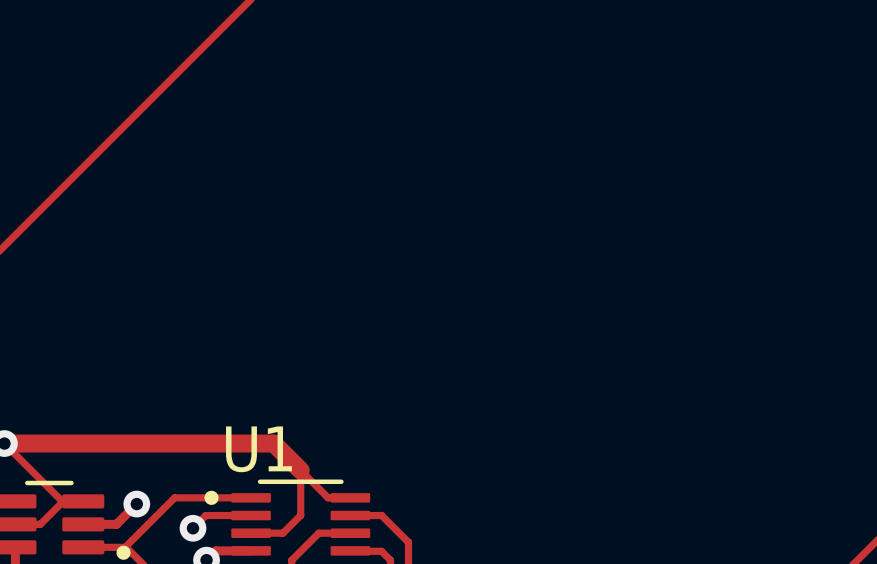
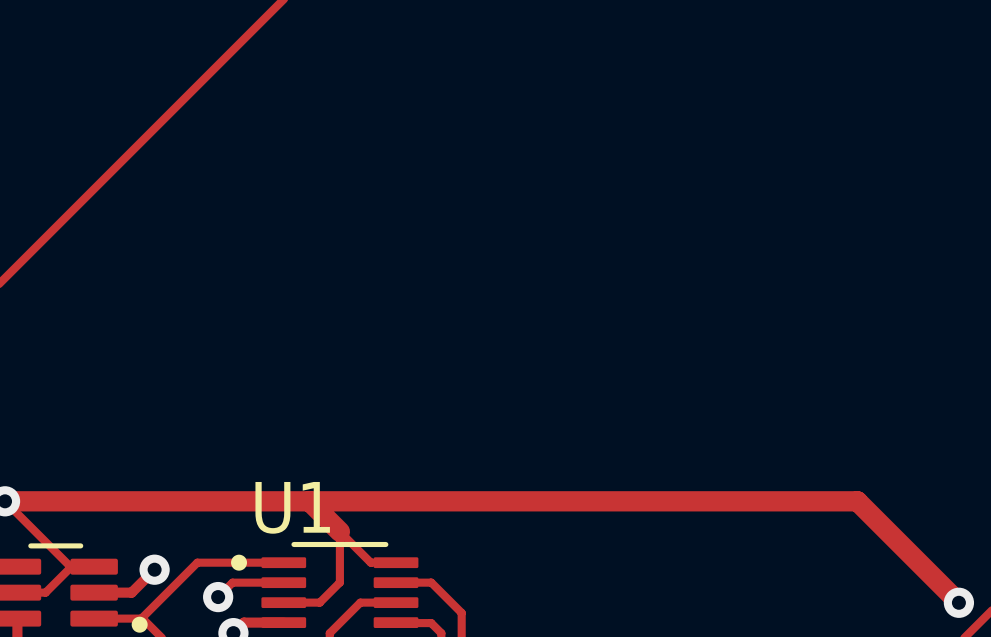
track: none -> (309, 501) (857, 501) (958, 602)
via: none -> (958, 602)

